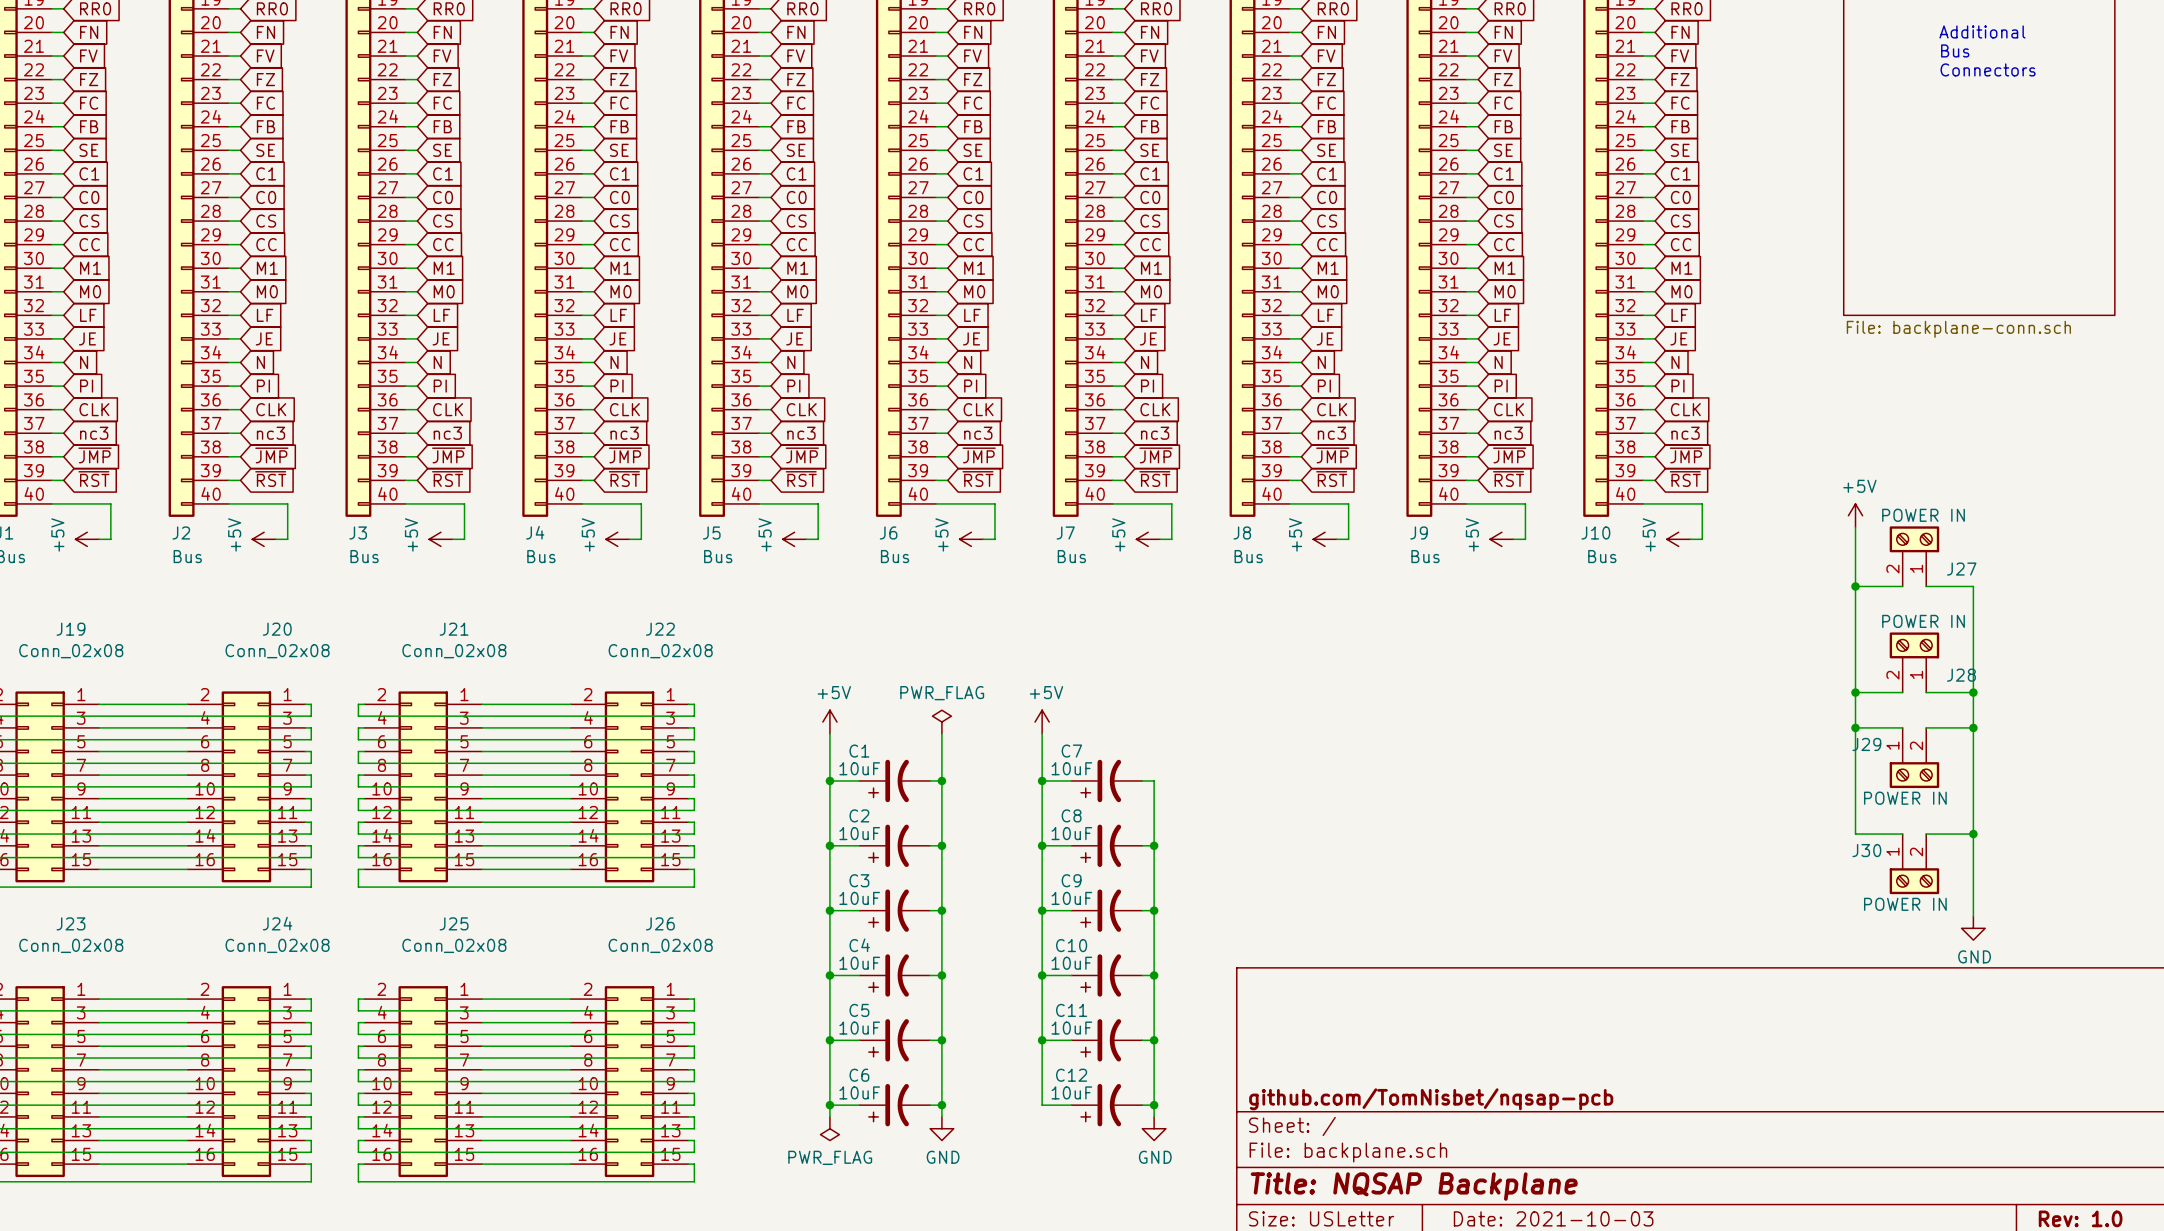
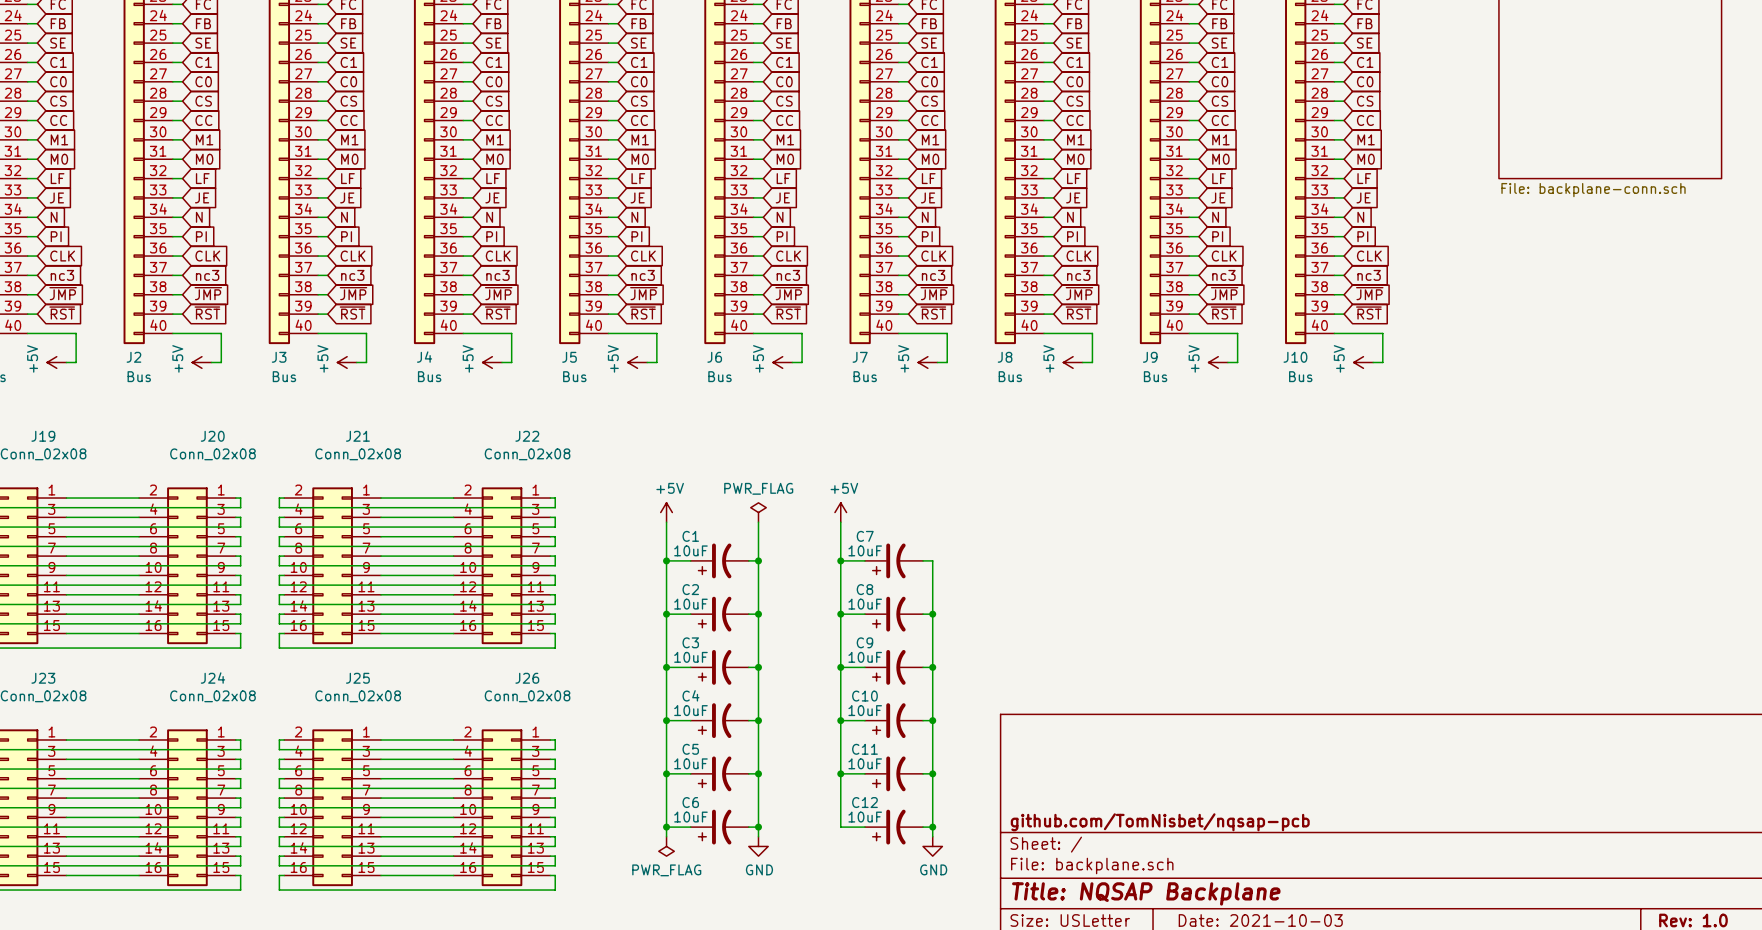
power symbol: +5V (1855, 515) -> none
wire: (1855, 527) (1855, 834) (1902, 834) -> none
J27: POWER IN (1914, 556) -> none
wire: (1855, 586) (1902, 586) -> none
junction: (1855, 586) -> none
wire: (1926, 586) (1973, 586) (1973, 916) -> none
J28: POWER IN (1914, 662) -> none
wire: (1855, 692) (1902, 692) -> none
junction: (1855, 692) -> none
wire: (1926, 692) (1973, 692) -> none
junction: (1973, 692) -> none
wire: (1855, 727) (1902, 727) -> none
junction: (1855, 727) -> none
wire: (1926, 727) (1973, 727) -> none
junction: (1973, 727) -> none
J29: POWER IN (1914, 757) -> none
wire: (1926, 834) (1973, 834) -> none
junction: (1973, 834) -> none
J30: POWER IN (1914, 864) -> none
power symbol: GND (1973, 928) -> none

